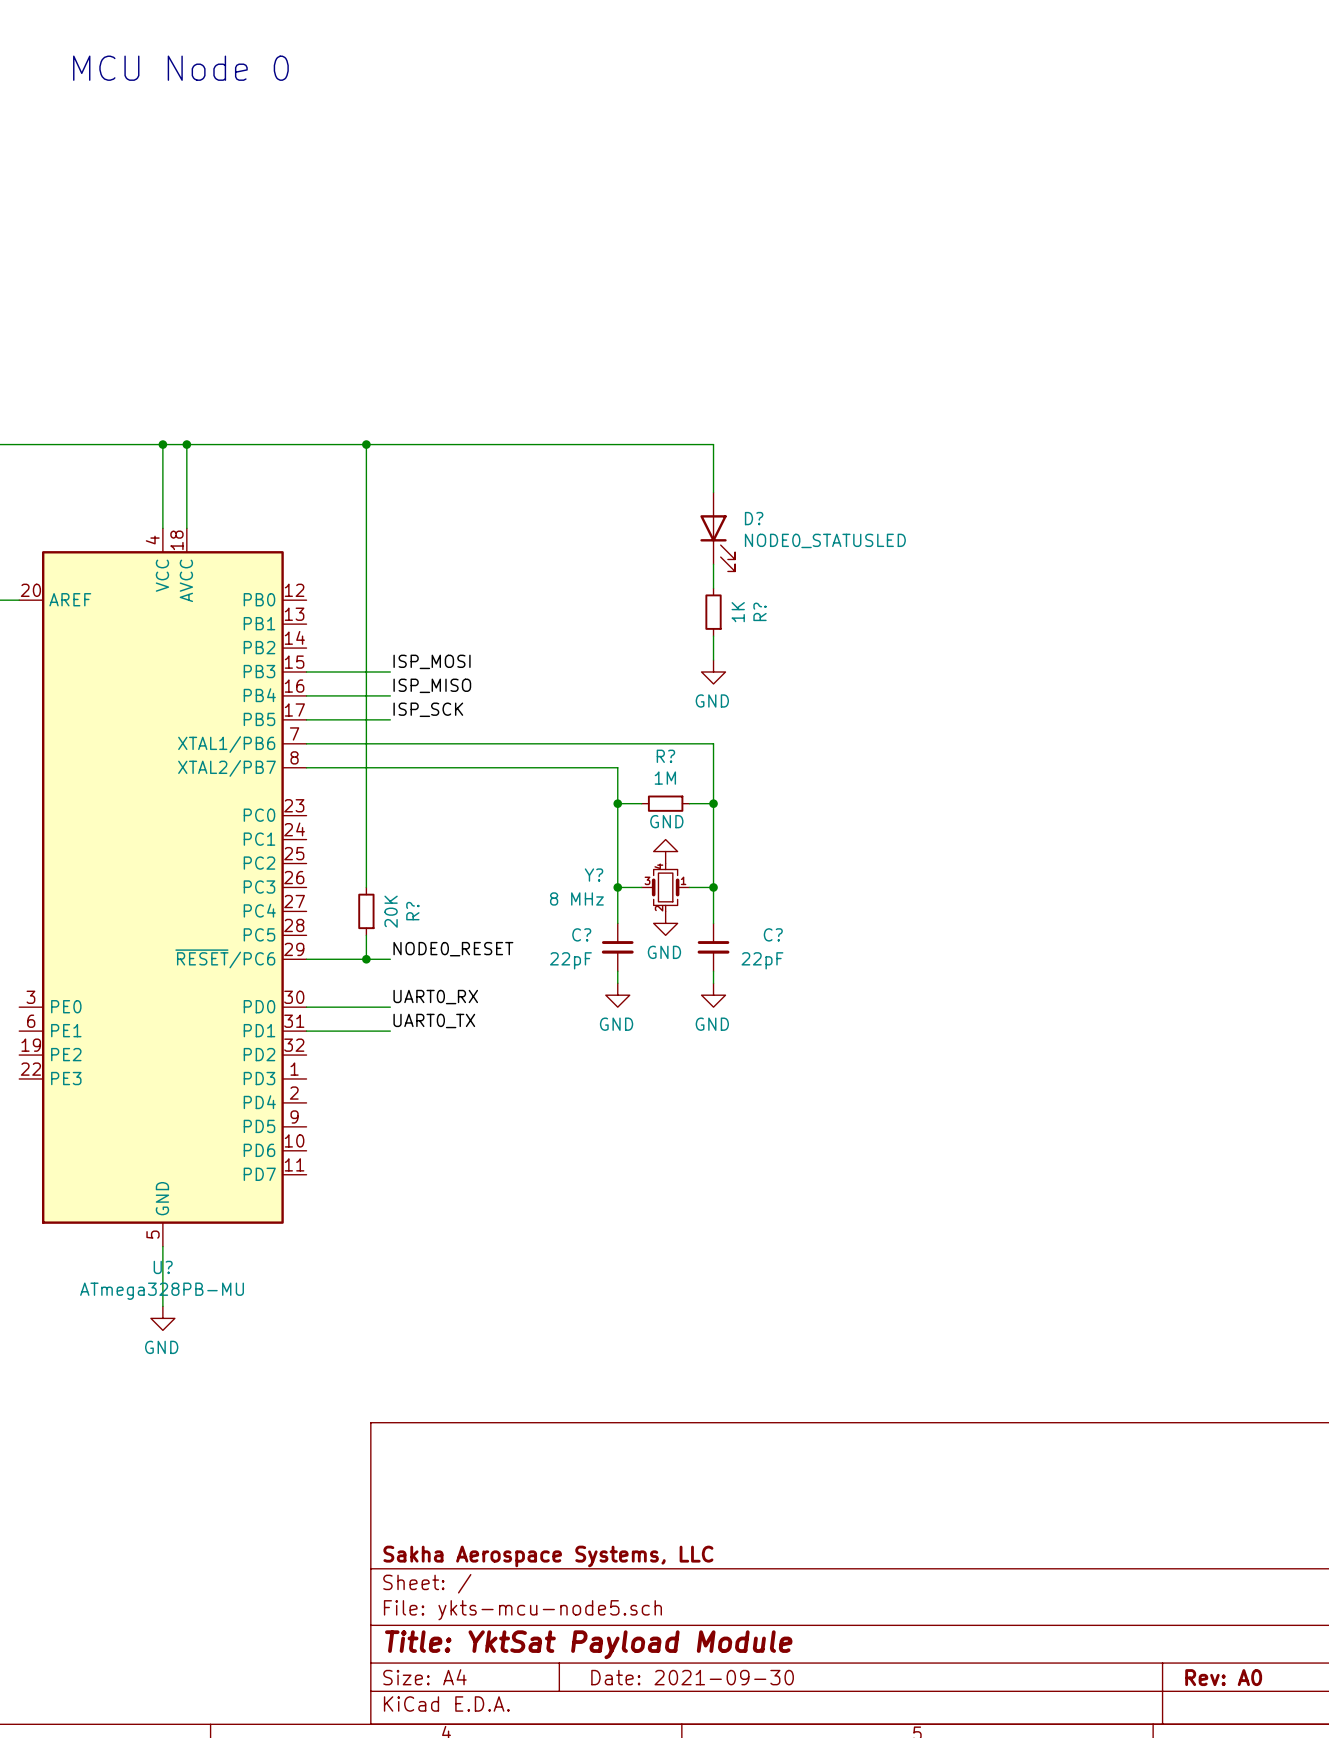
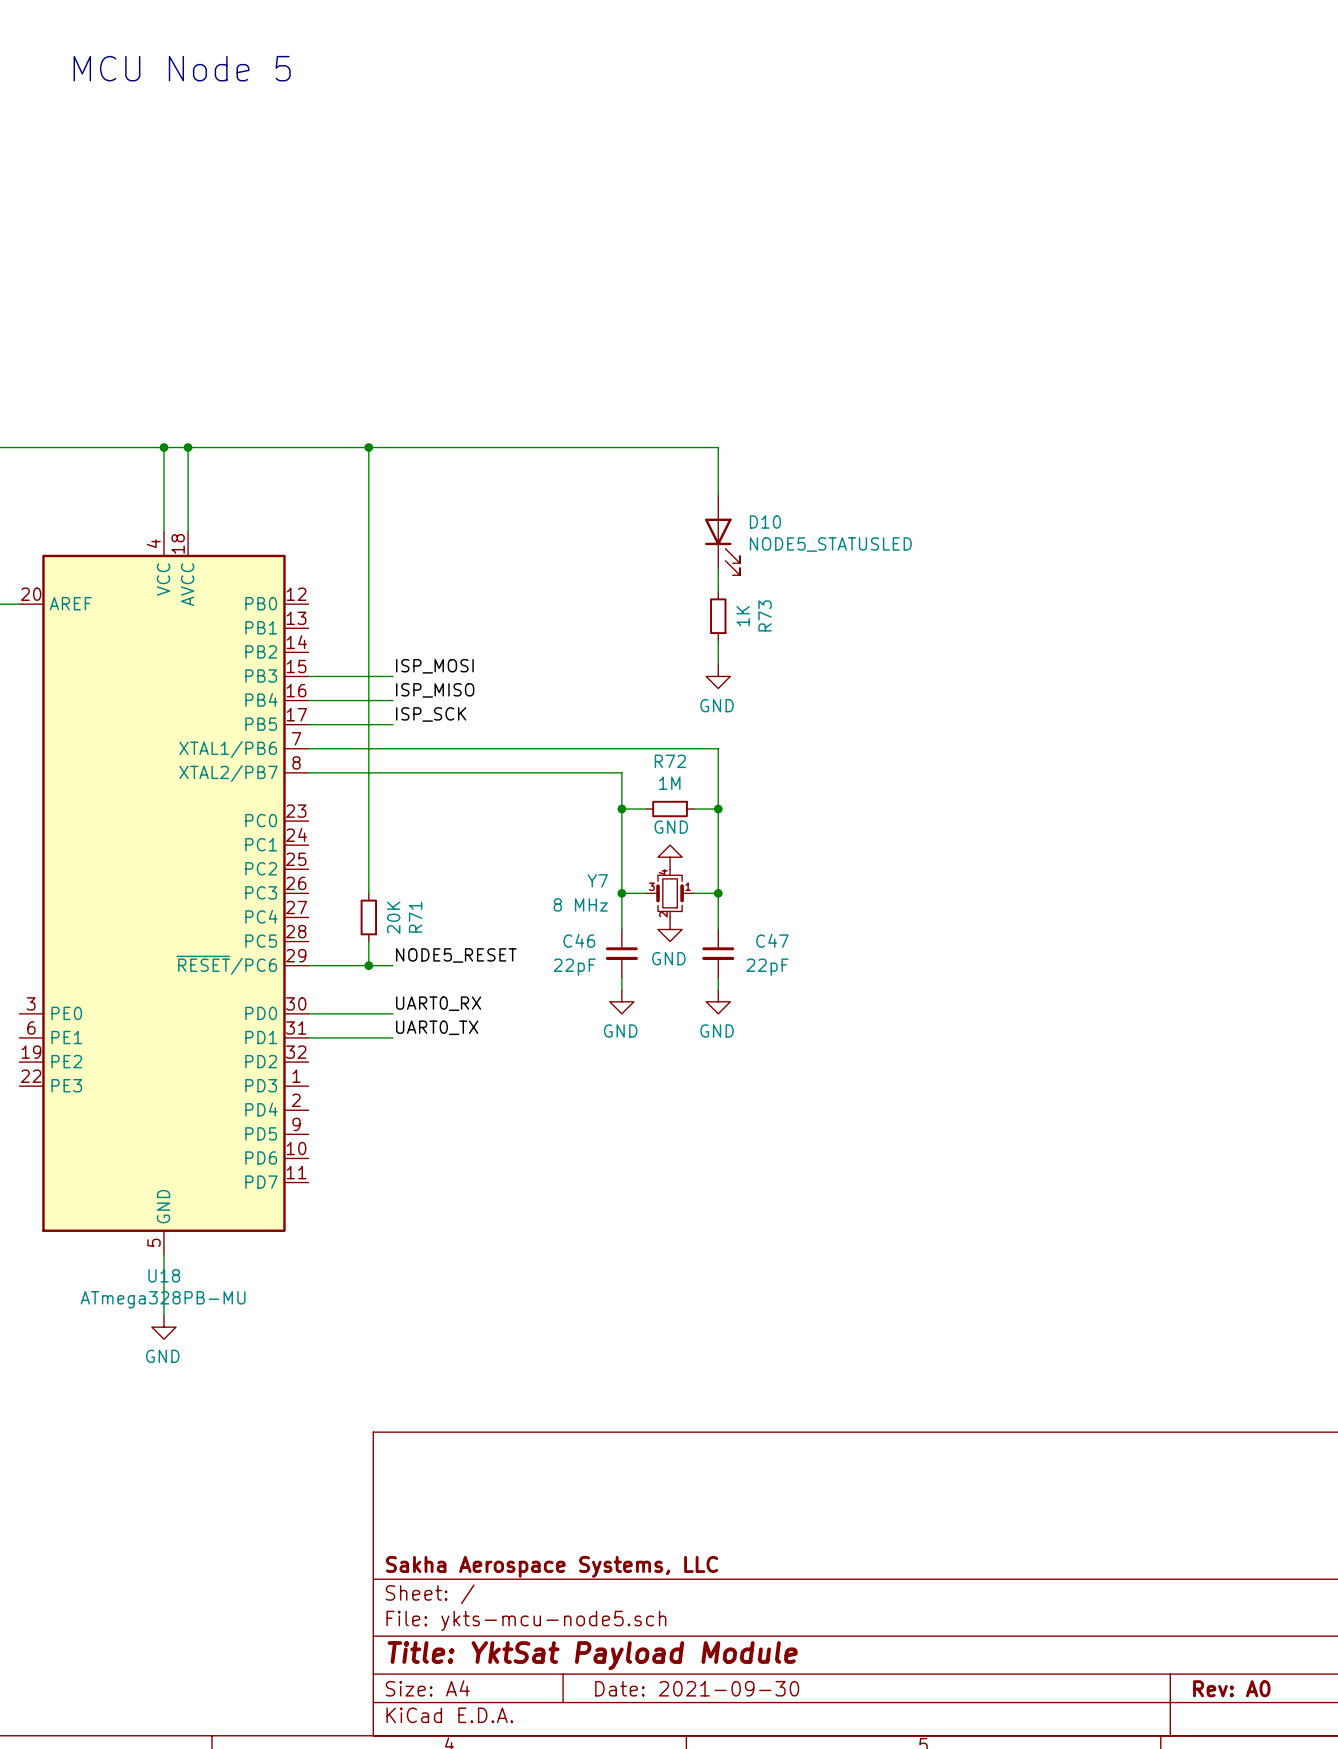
text: MCU Node 0 (180, 68) -> MCU Node 5 (182, 68)
D? name: D? (754, 518) -> D10 (765, 522)
D? value: NODE0_STATUSLED (825, 540) -> NODE5_STATUSLED (830, 544)
R? name: R? (760, 611) -> R73 (765, 615)
R? name: R? (665, 756) -> R72 (670, 761)
Y? name: Y? (594, 875) -> Y7 (597, 880)
R? name: R? (412, 911) -> R71 (415, 917)
C? name: C? (581, 934) -> C46 (579, 940)
C? name: C? (773, 934) -> C47 (772, 940)
label: NODE0_RESET (453, 949) -> NODE5_RESET (456, 955)
U? name: U? (163, 1267) -> U18 (164, 1275)

